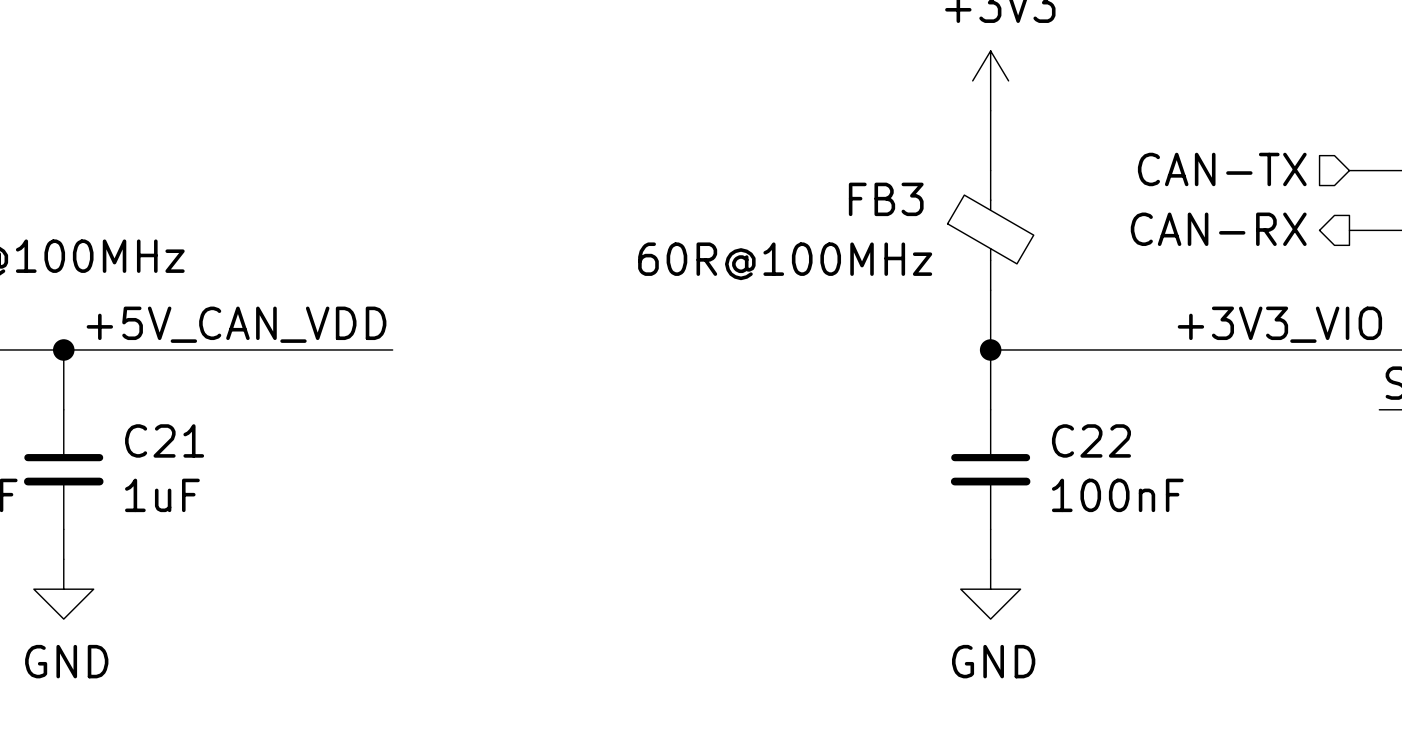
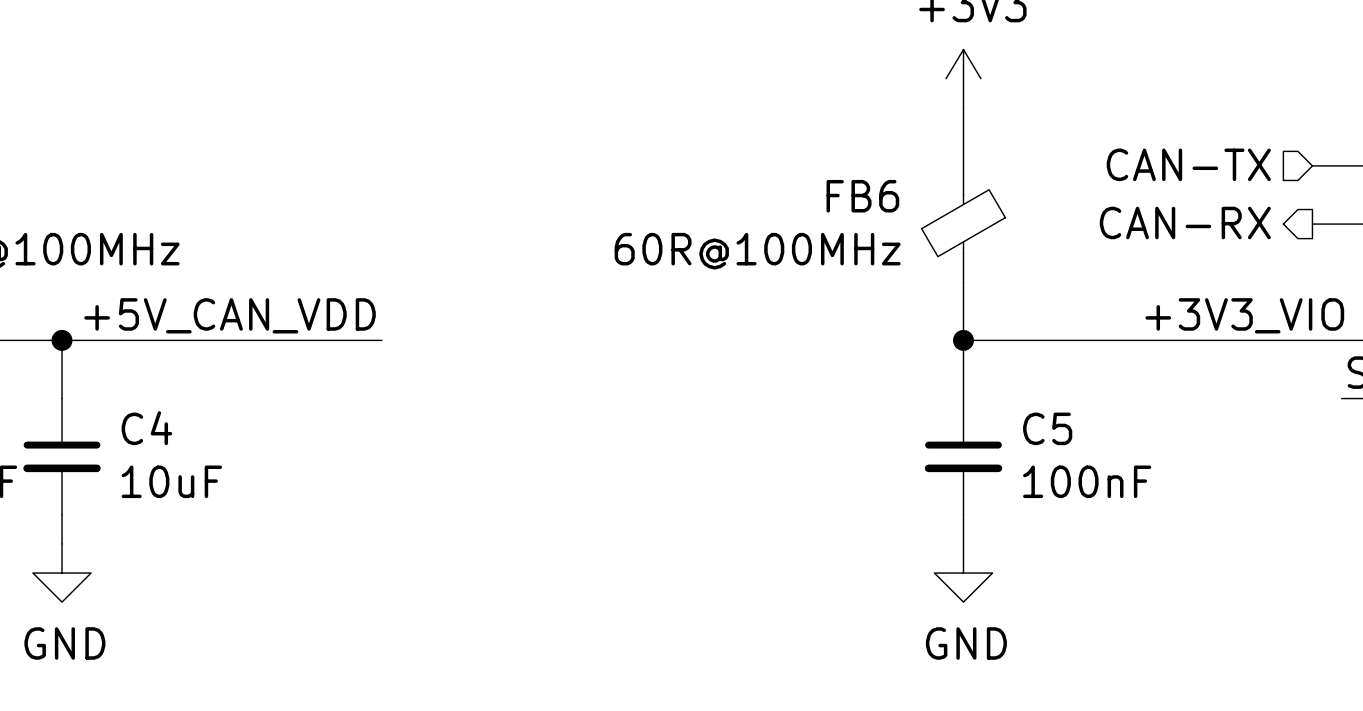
FB3: 60R@100MHz (990, 230) -> none
FB6: none -> 60R@100MHz (963, 224)
C21 name: C21 (164, 440) -> C4 (146, 428)
C22 name: C22 (1091, 440) -> C5 (1047, 428)
C21 value: 1uF (162, 495) -> 10uF (171, 481)

